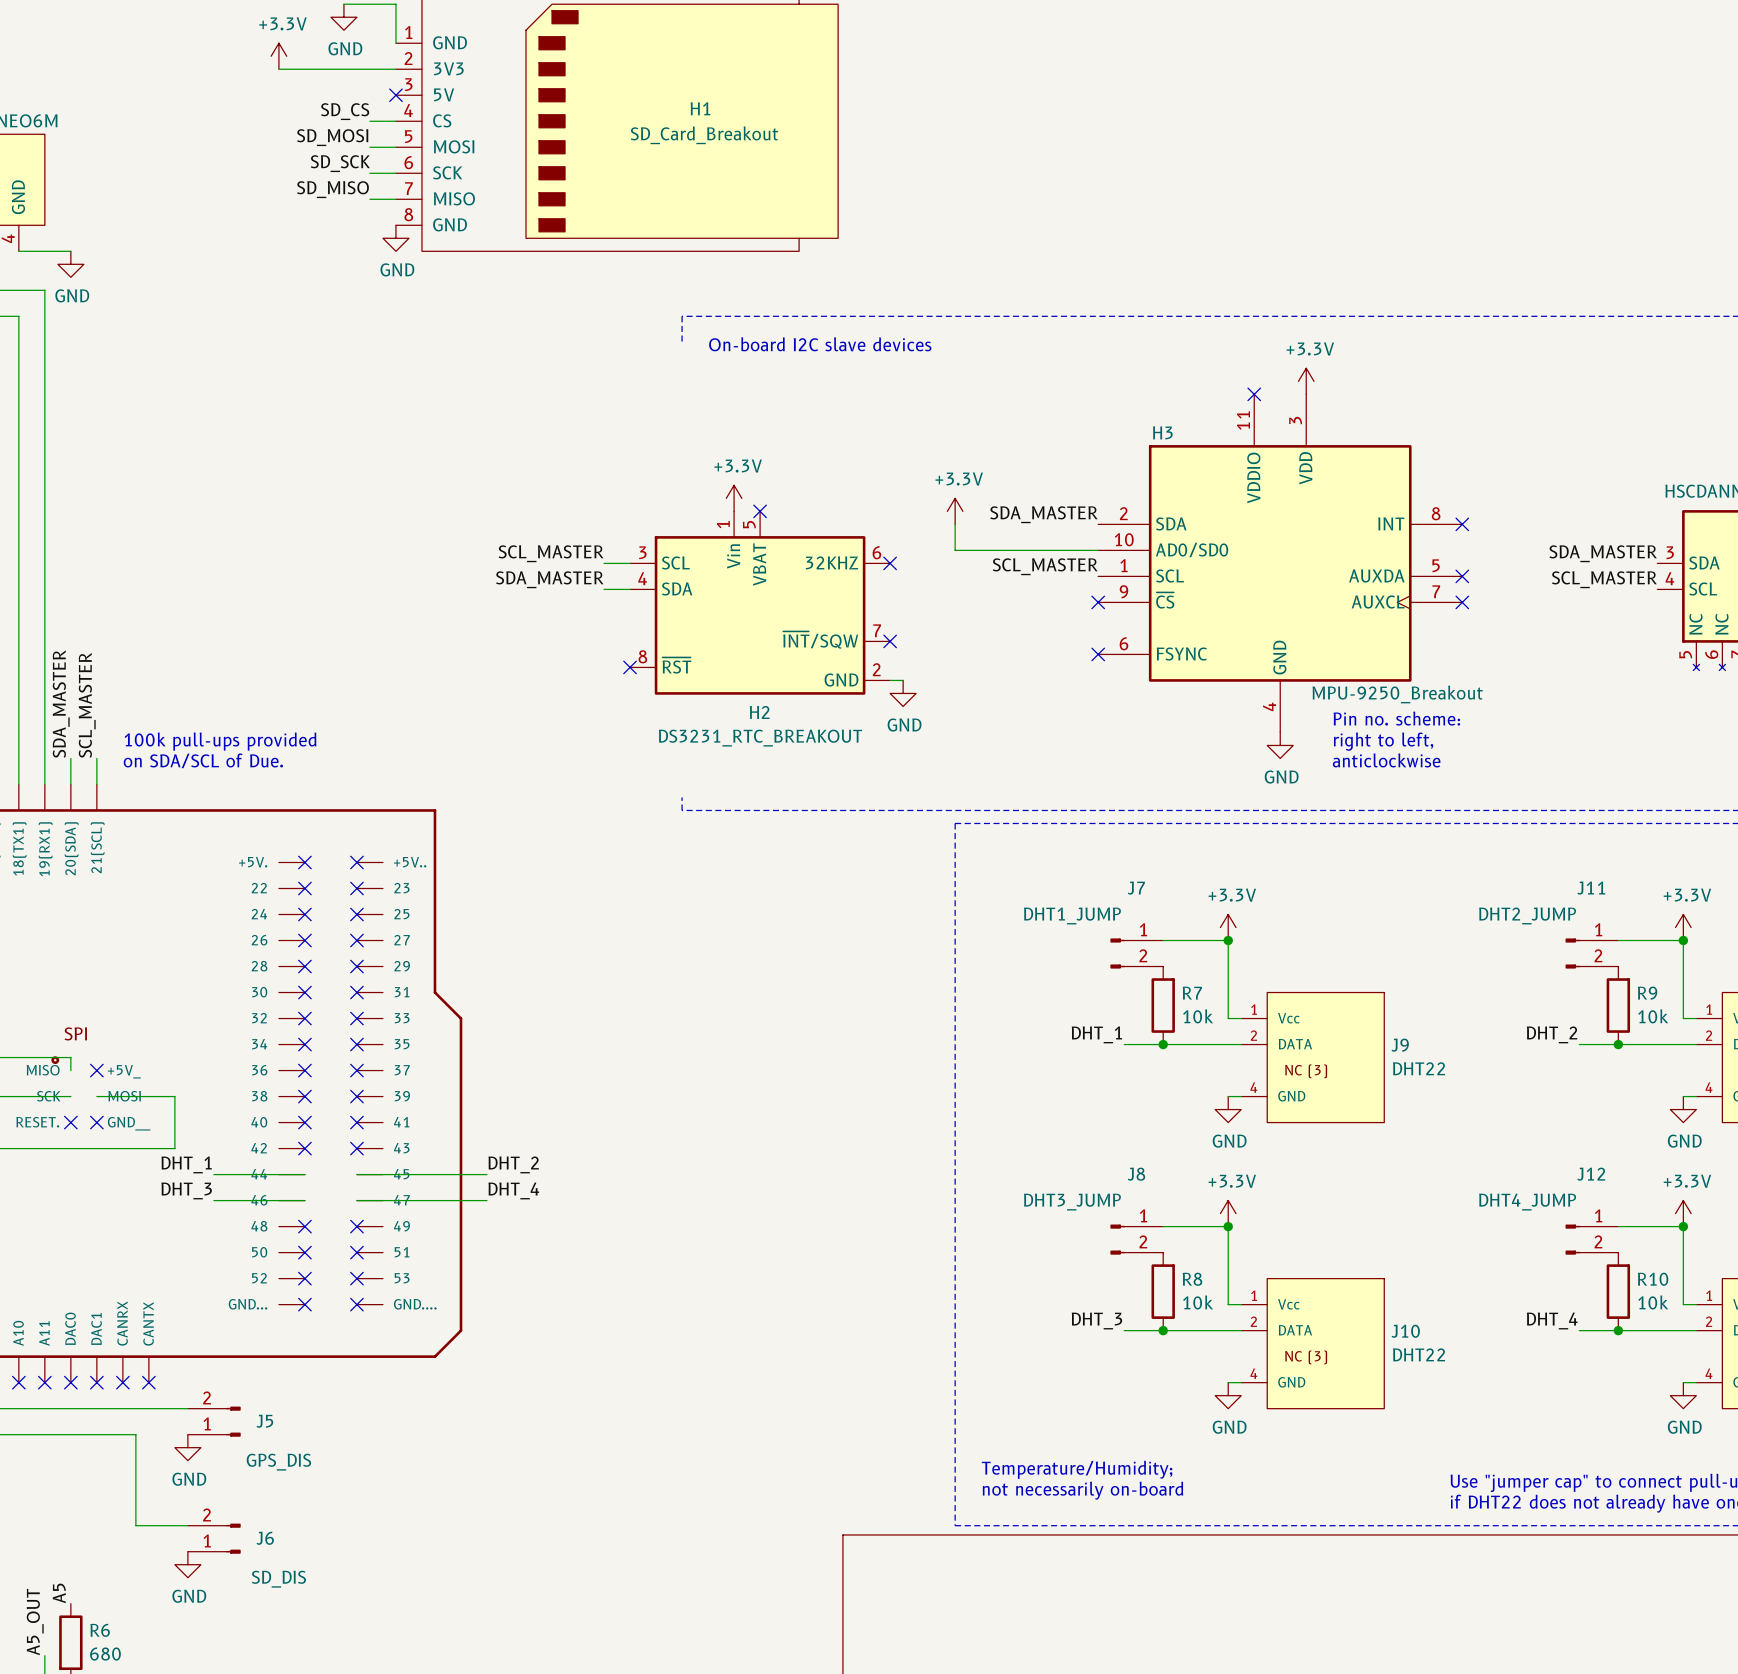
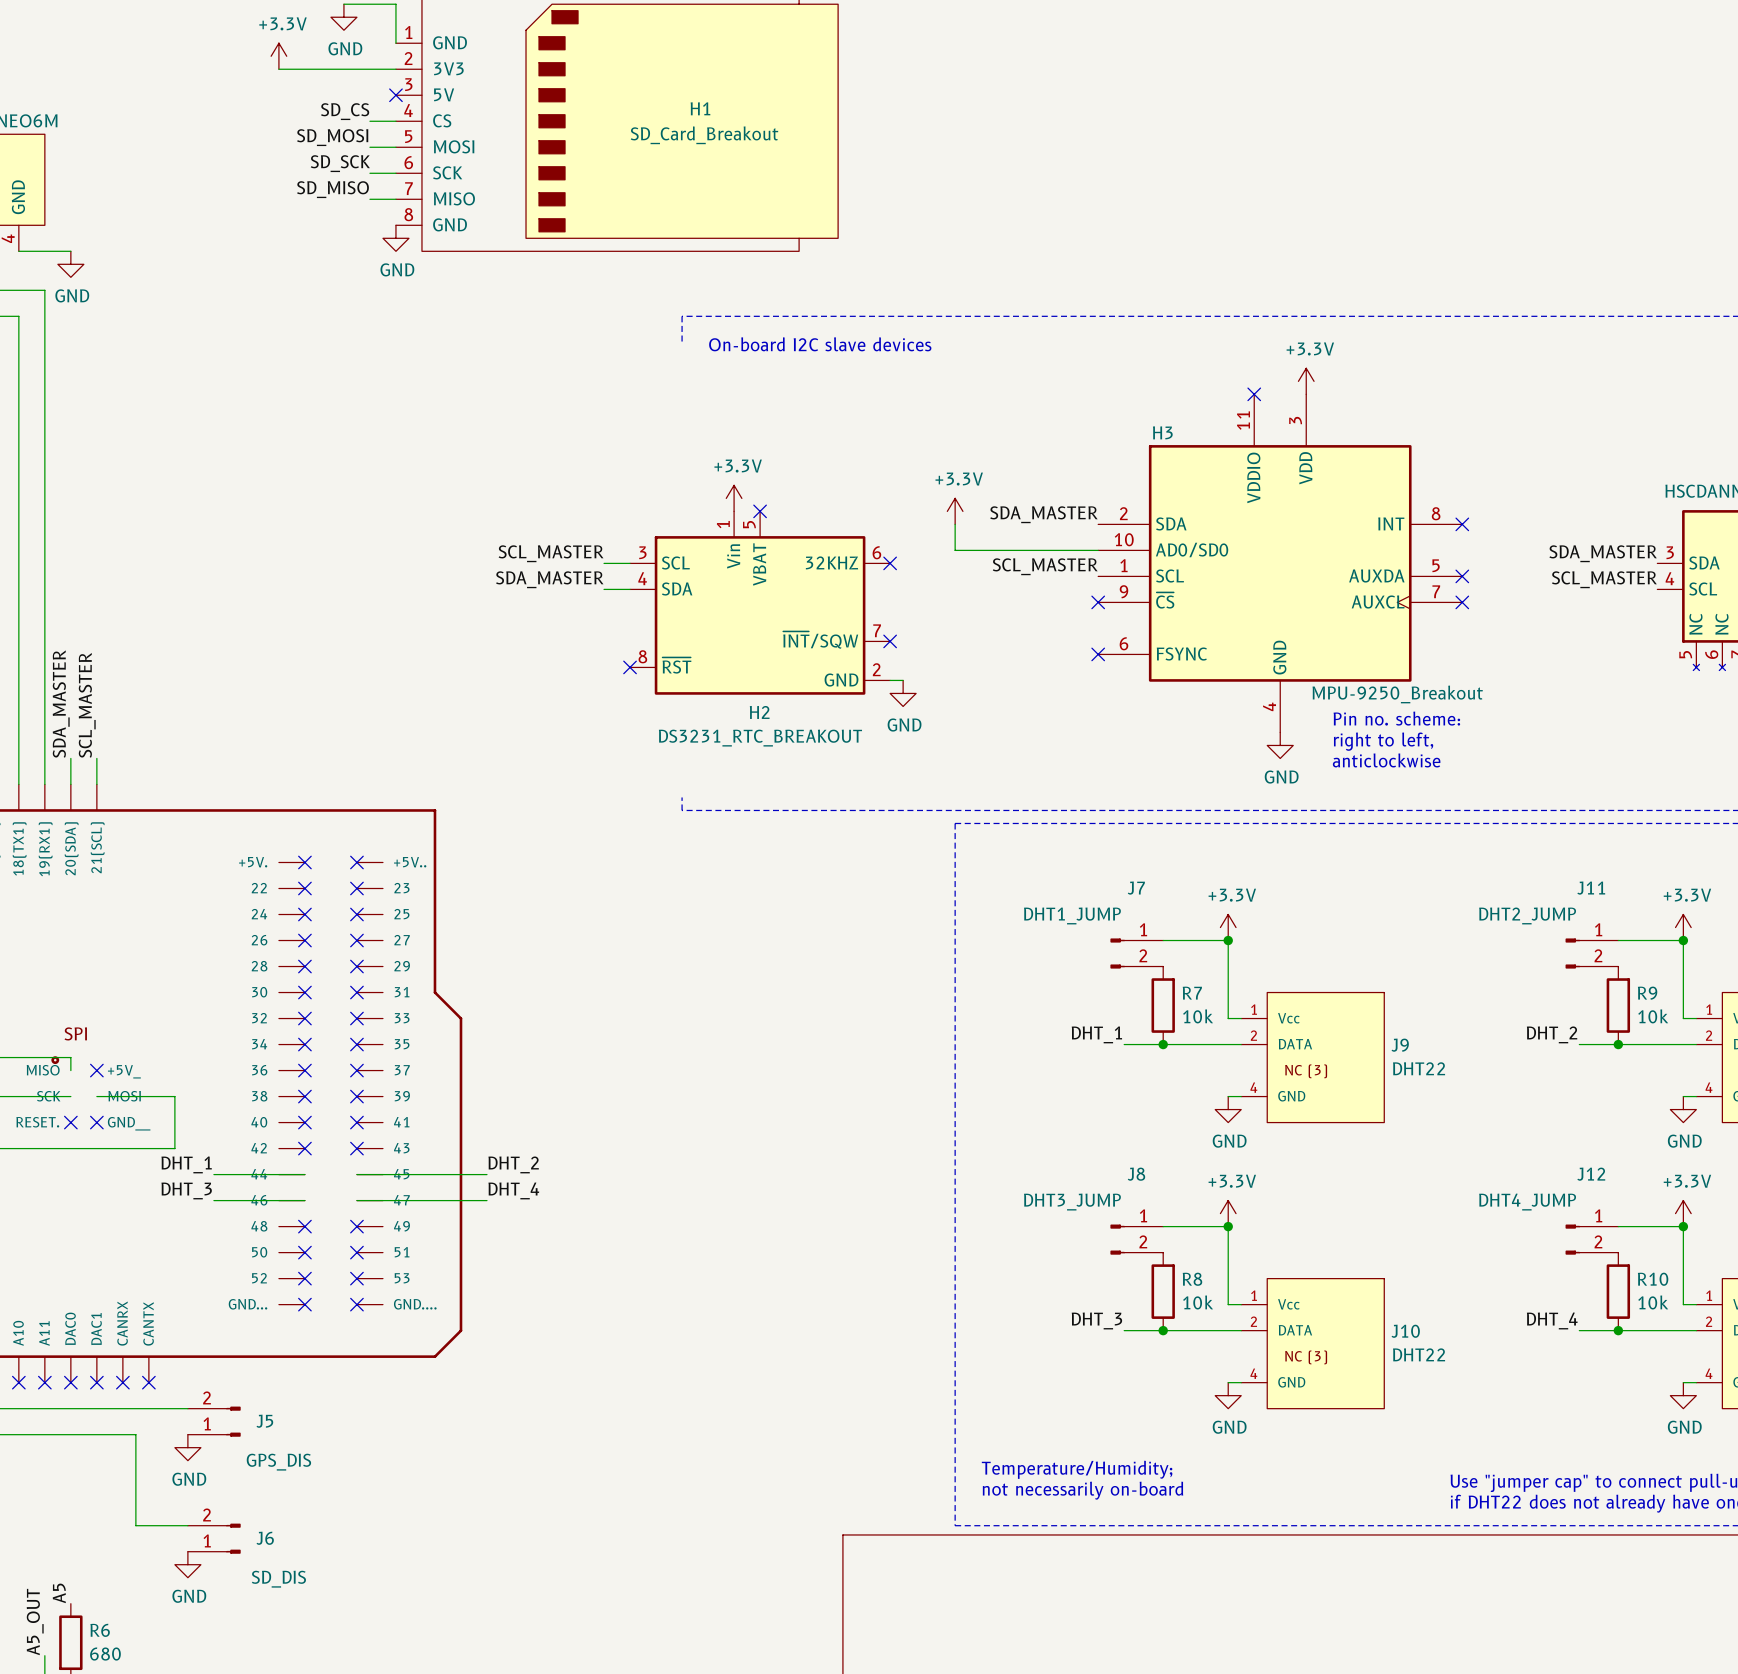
text: 100k pull-ups provided (220, 741) -> none
text: on SDA/SCL of Due. (203, 760) -> none

